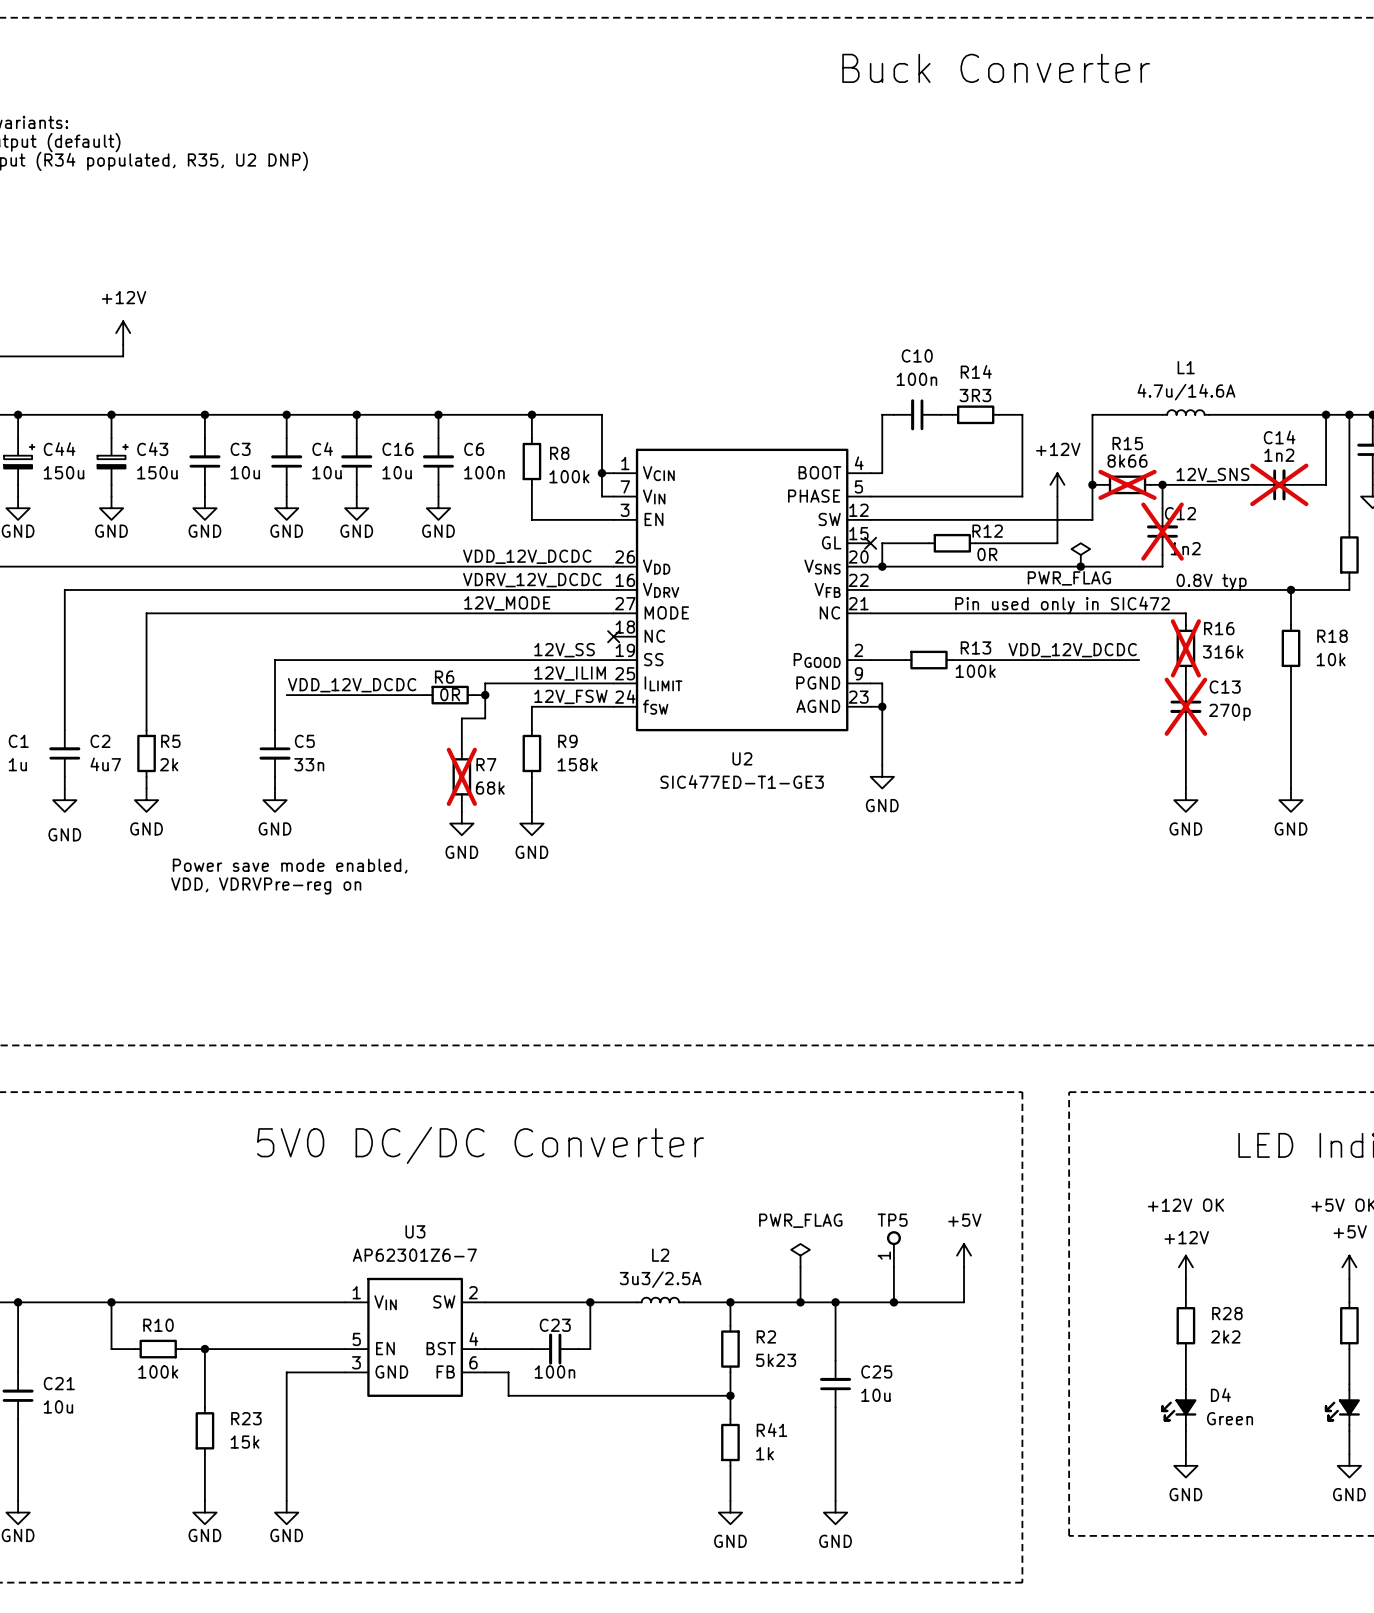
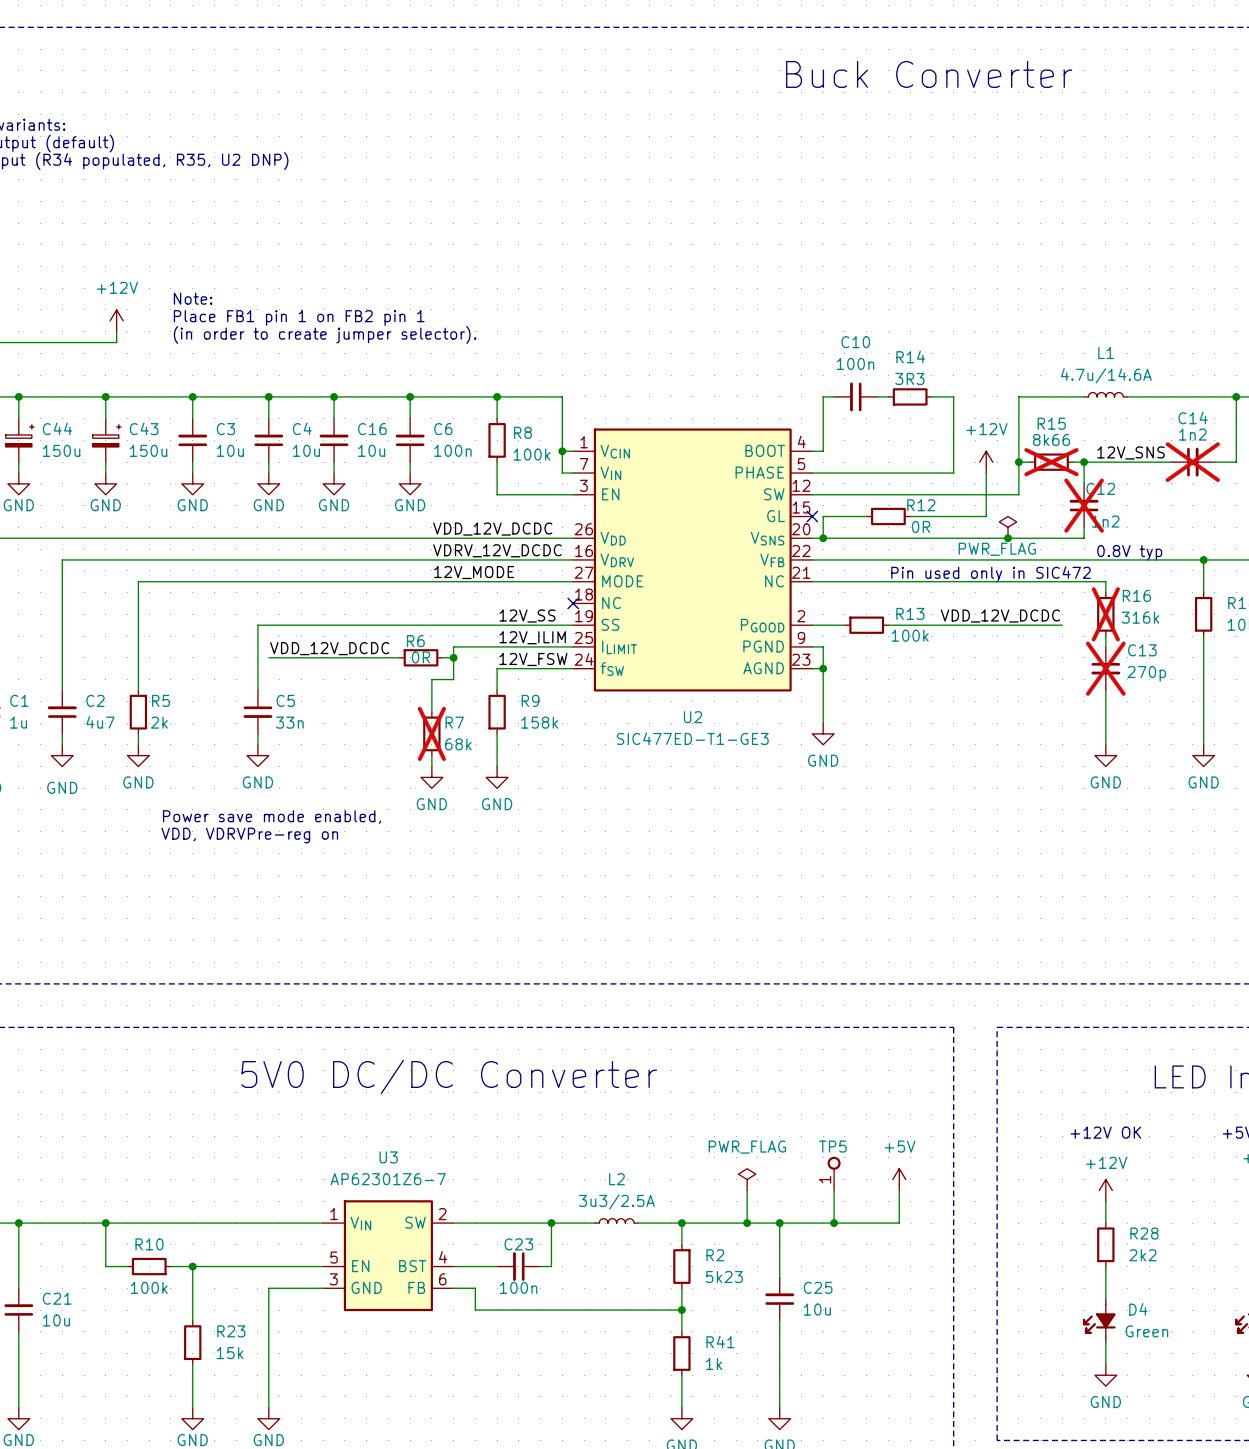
text: none -> Note: (193, 298)
text: none -> Place FB1 pin 1 on FB2 pin 1 (299, 317)
text: none -> (in order to create jumper selector). (325, 334)

